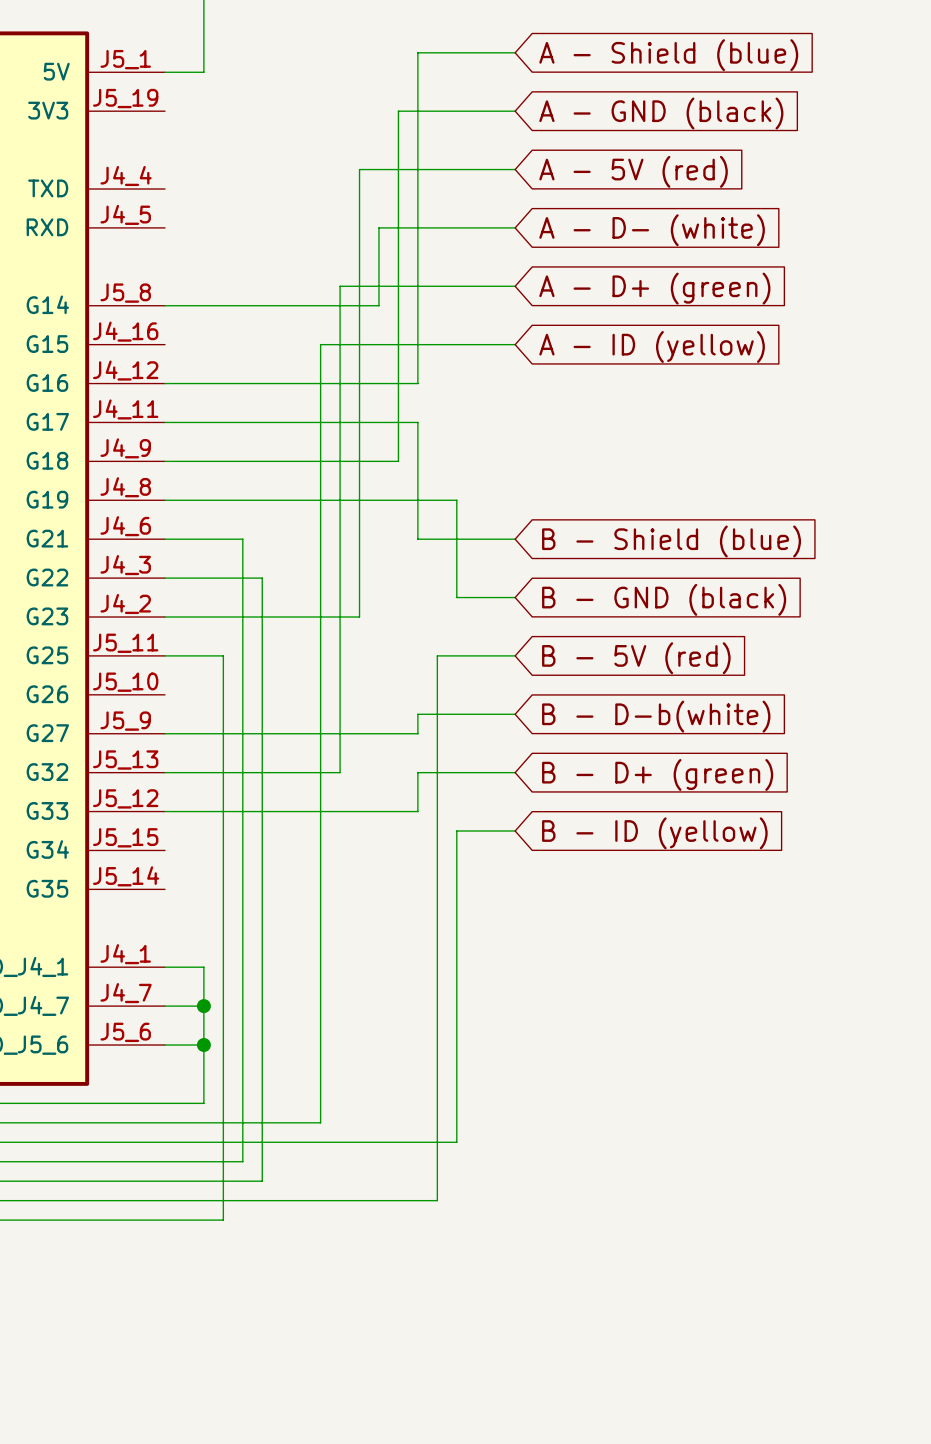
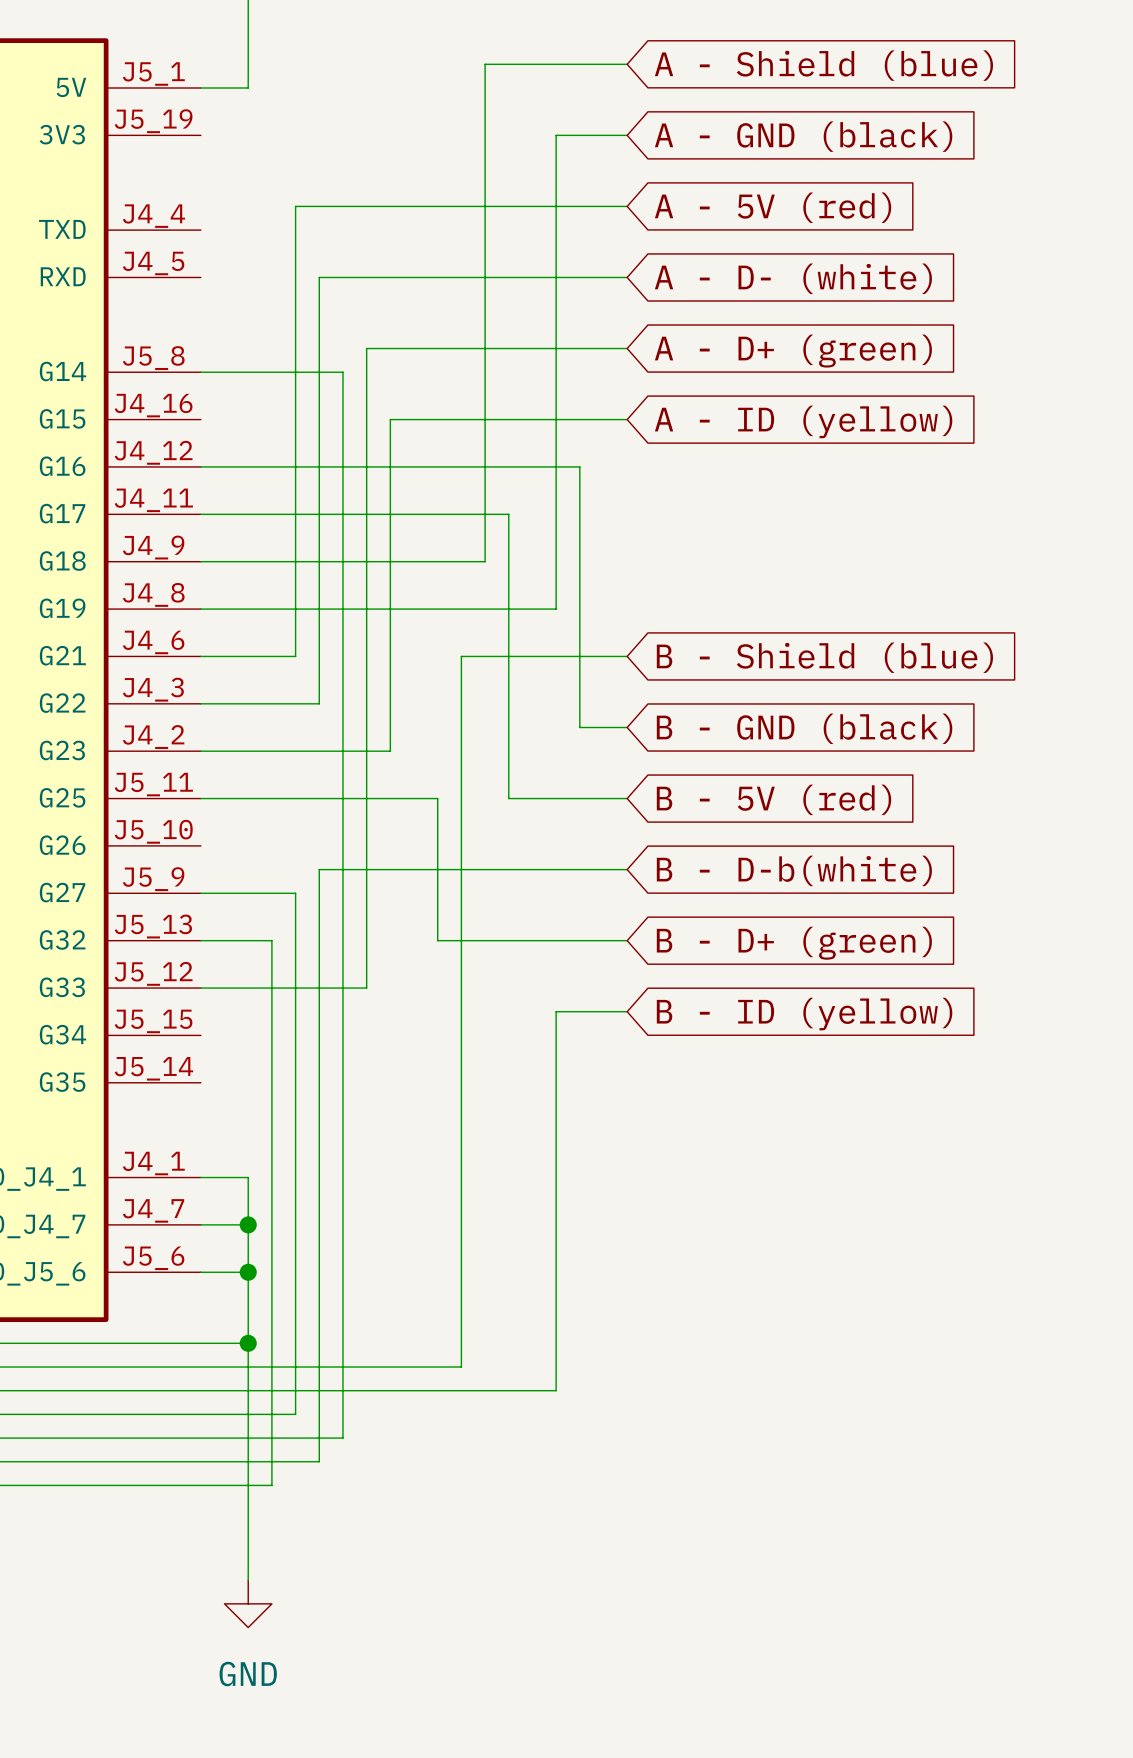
wire: (417, 52) (417, 383) -> none
wire: (398, 111) (456, 111) -> (485, 135) (485, 64) (508, 64)
wire: none -> (556, 135) (556, 609)
wire: (359, 169) (359, 617) (320, 617) (320, 1122) -> (437, 206) (295, 206) (295, 656)
wire: (378, 227) (378, 305) (281, 305) -> (461, 277) (319, 277) (319, 703)
wire: (340, 286) (340, 772) (223, 772) (223, 655) -> (414, 348) (366, 348) (366, 988)
wire: none -> (342, 372) (342, 1438) (319, 1438) (319, 1461)
wire: (456, 500) (456, 597) (476, 597) -> (508, 466) (579, 466) (579, 727)
wire: (242, 539) (242, 733) (417, 733) (417, 714) -> (319, 869) (508, 869)
wire: (262, 578) (262, 714) -> none
wire: (437, 655) (437, 1200) (262, 1200) -> (532, 798) (508, 798) (508, 656) (461, 656) (461, 1367) (390, 1367)
wire: (417, 772) (417, 811) (301, 811) -> (508, 940) (437, 940) (437, 798) (271, 798)
wire: none -> (248, 1343) (248, 1580)
junction: none -> (248, 1343)
power symbol: none -> GND (248, 1603)

